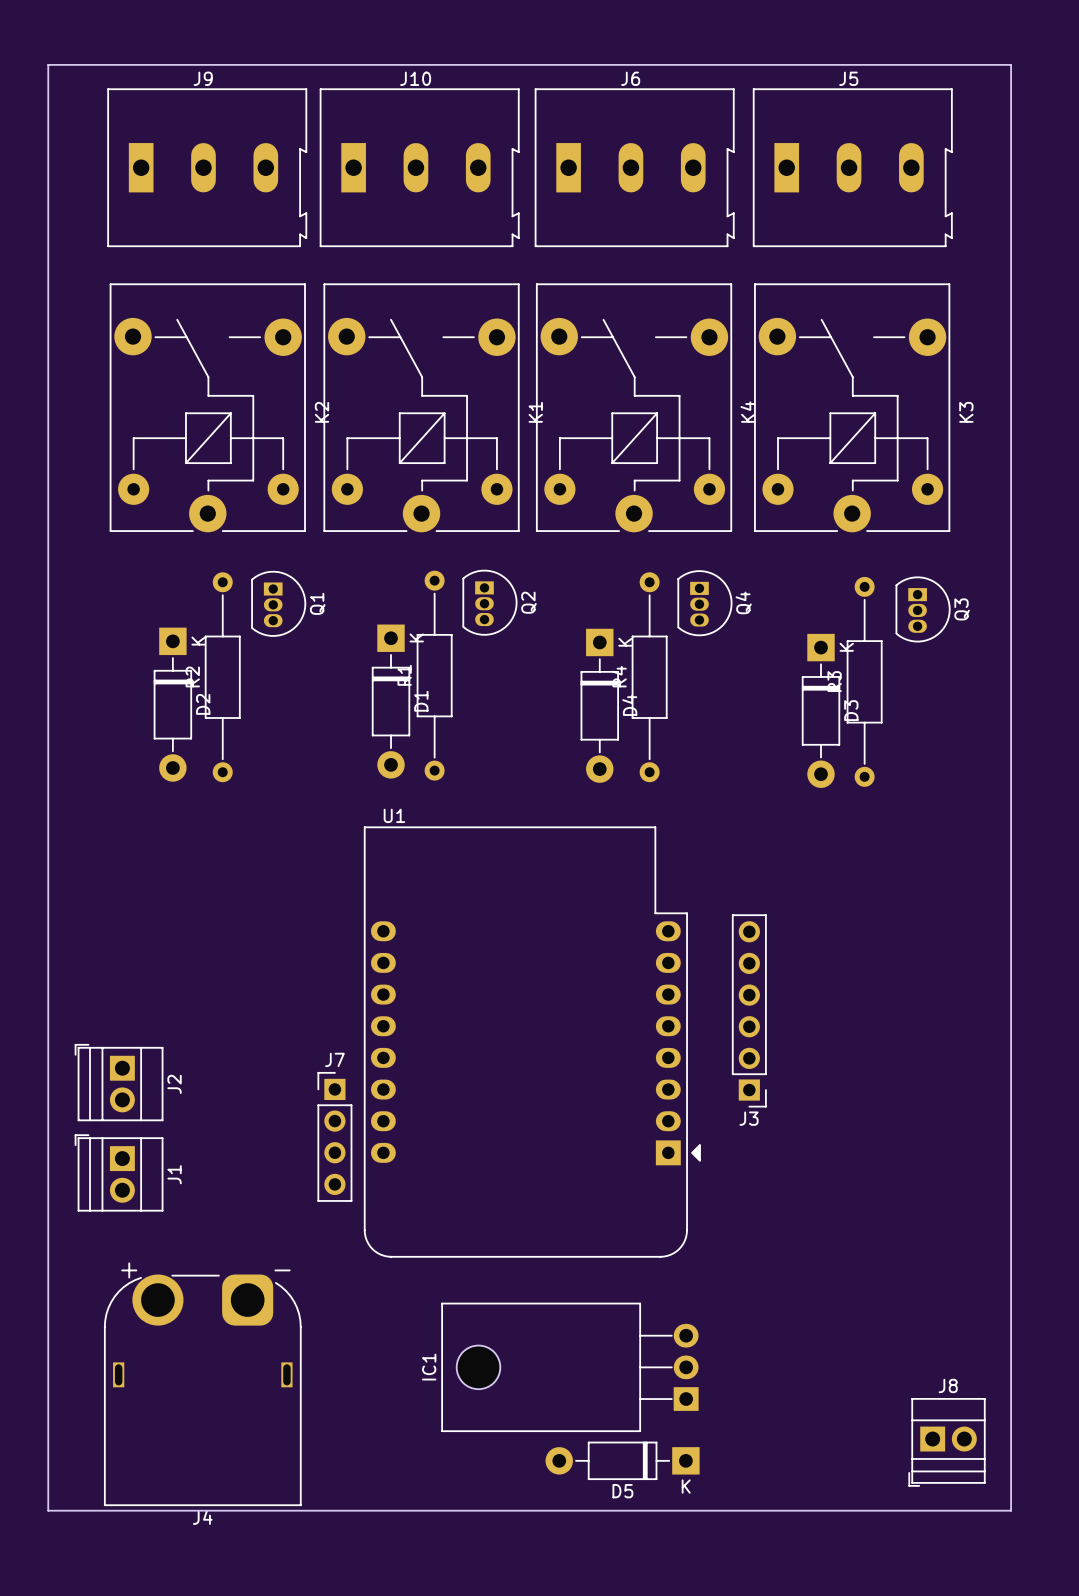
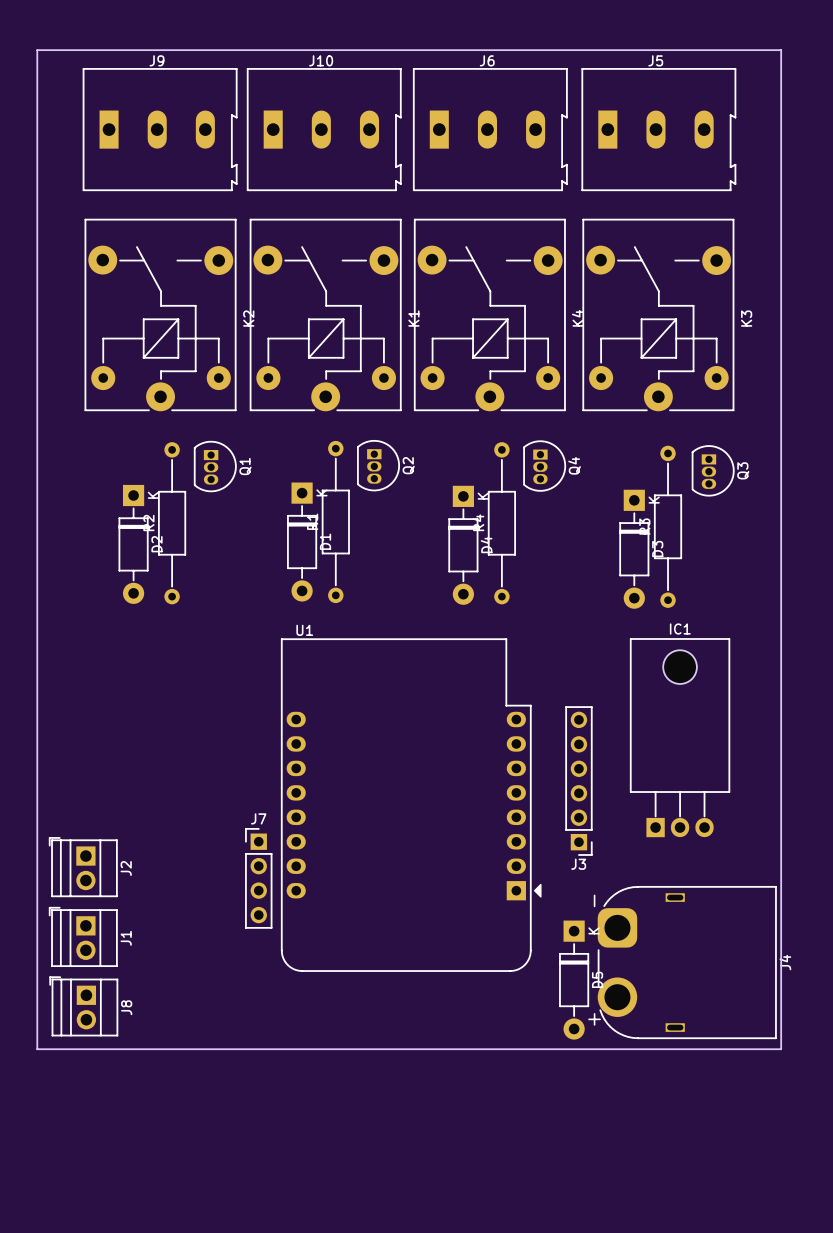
J2 position: (119, 1082) -> (83, 867)
J1 position: (119, 1172) -> (83, 936)
board edge: (48, 1358) (48, 1510) (1011, 1510) (1011, 1358) -> (37, 1049) (781, 1049)
IC1 rotation: 0° (569, 1367) -> 90° clockwise (680, 737)
IC1 position: (569, 1367) -> (680, 737)
J4 rotation: 0° (202, 1390) -> 90° counterclockwise (687, 962)
J4 position: (202, 1390) -> (687, 962)
J8 rotation: 0° (947, 1442) -> 90° clockwise (83, 1006)
J8 position: (947, 1442) -> (83, 1006)
D5 rotation: 0° (622, 1460) -> 90° counterclockwise (574, 980)
D5 position: (622, 1460) -> (574, 980)

